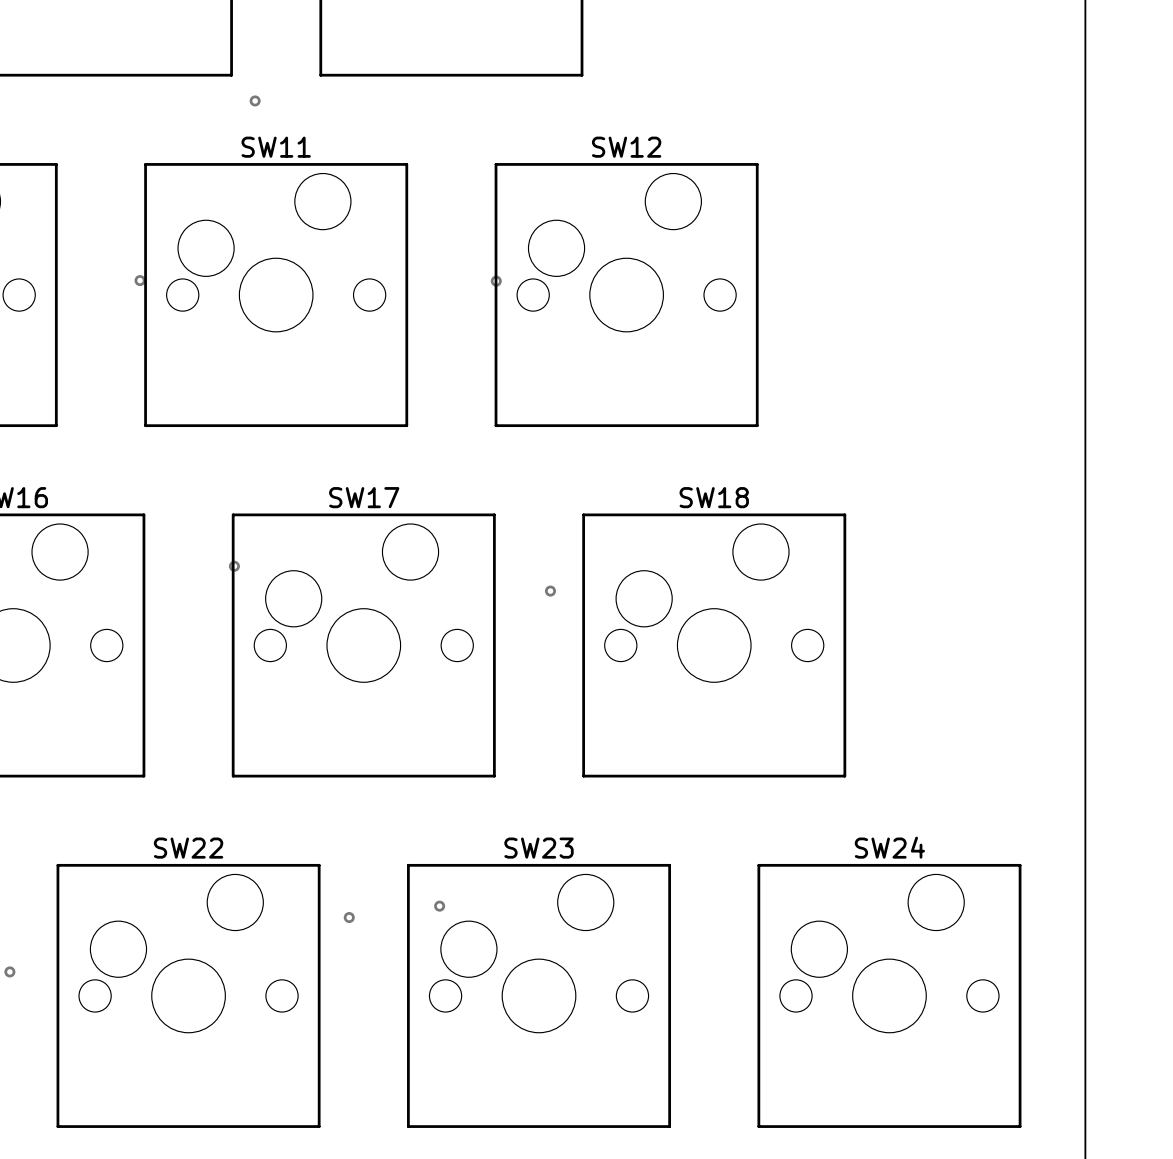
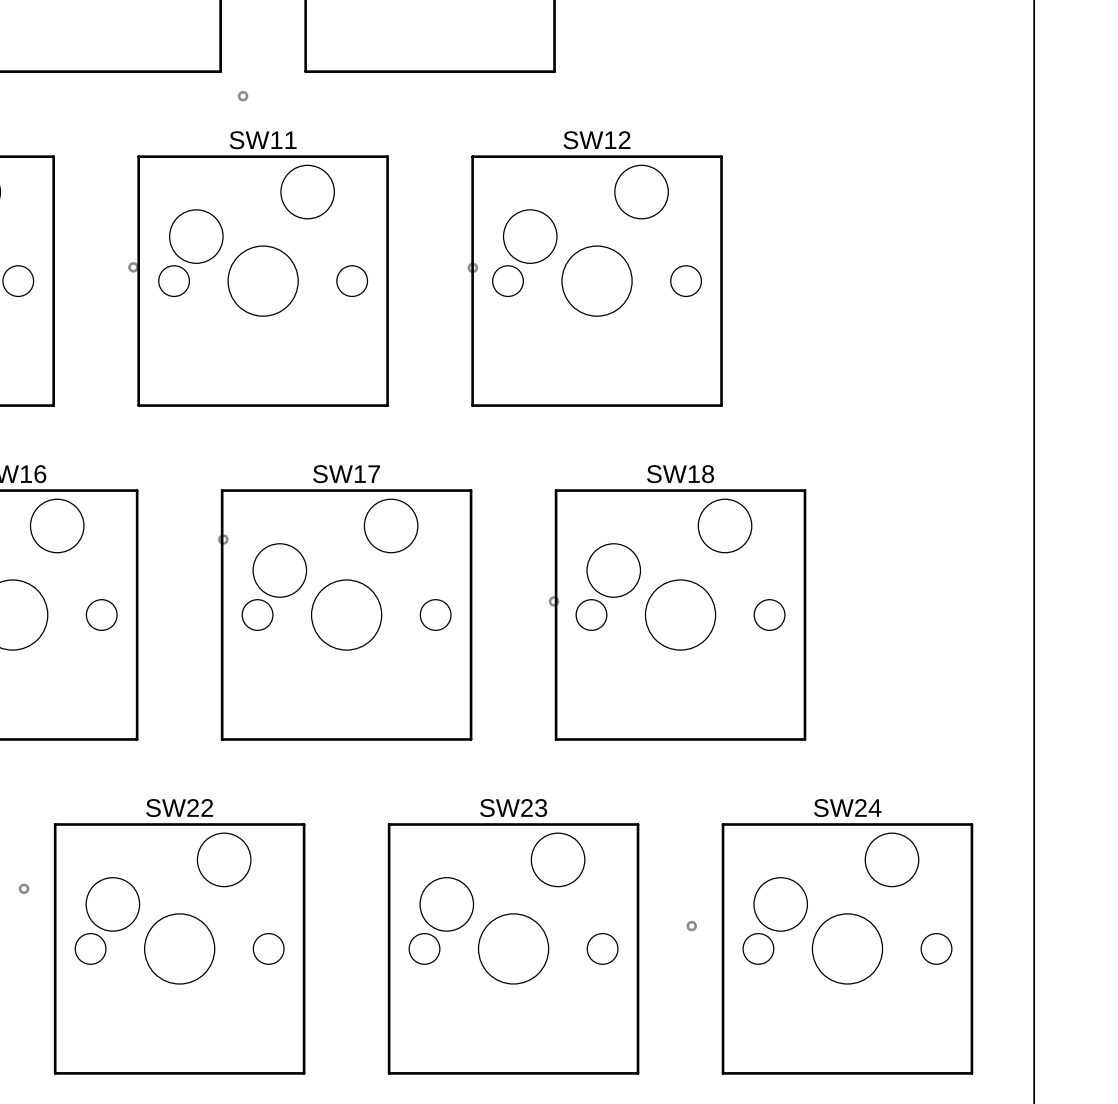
via position: (550, 591) -> (554, 601)
via: (439, 906) -> none
via: (349, 917) -> none
via position: (9, 971) -> (24, 888)
via: none -> (691, 926)

